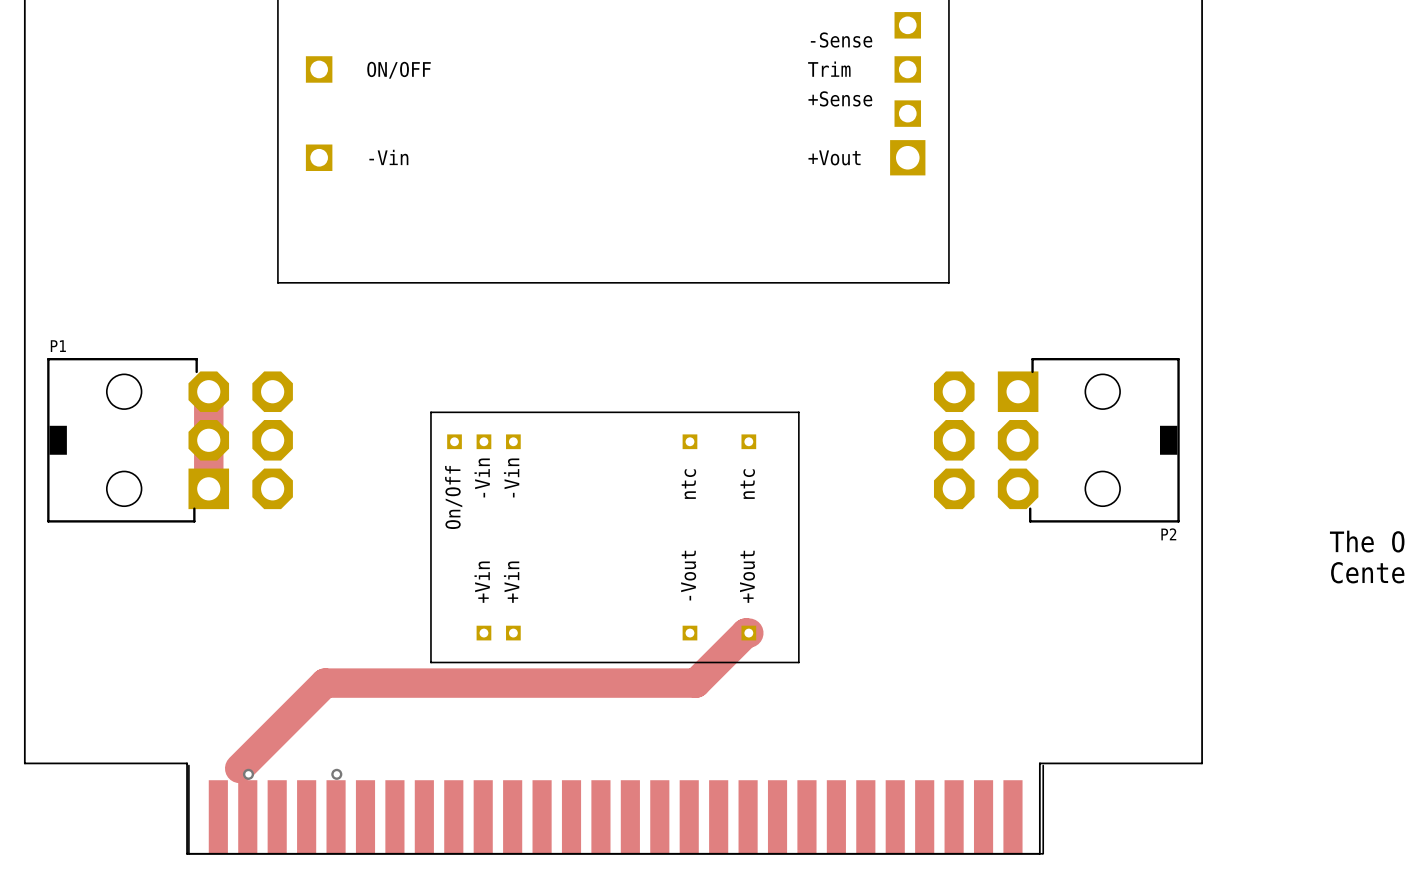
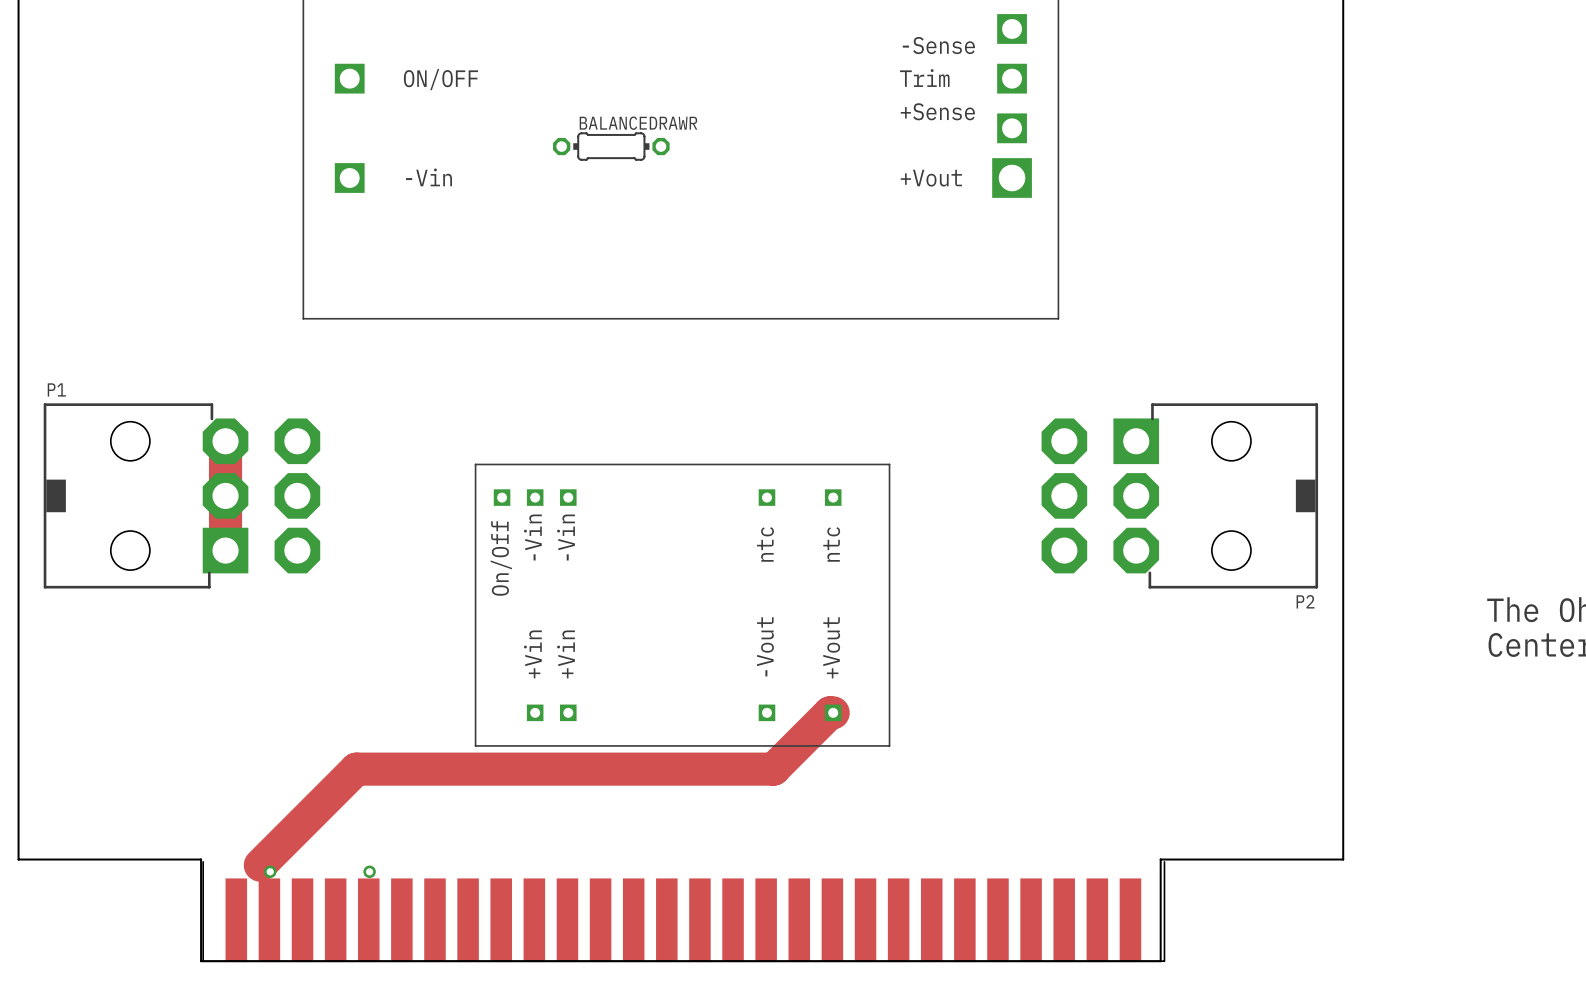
BALANCEDRAWR: none -> (611, 146)

